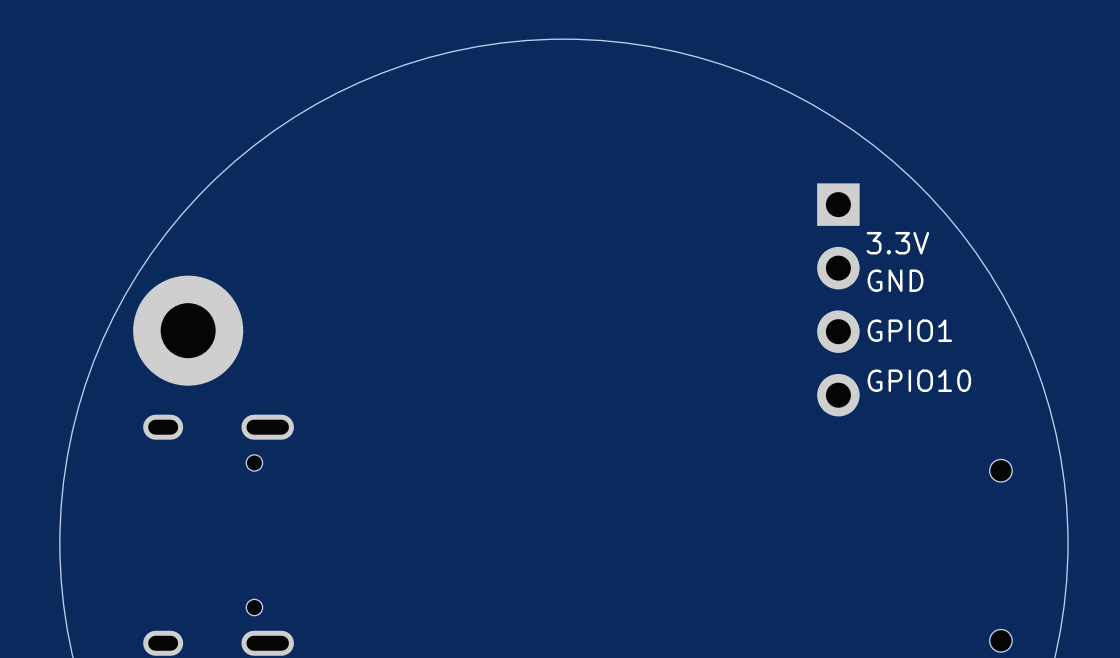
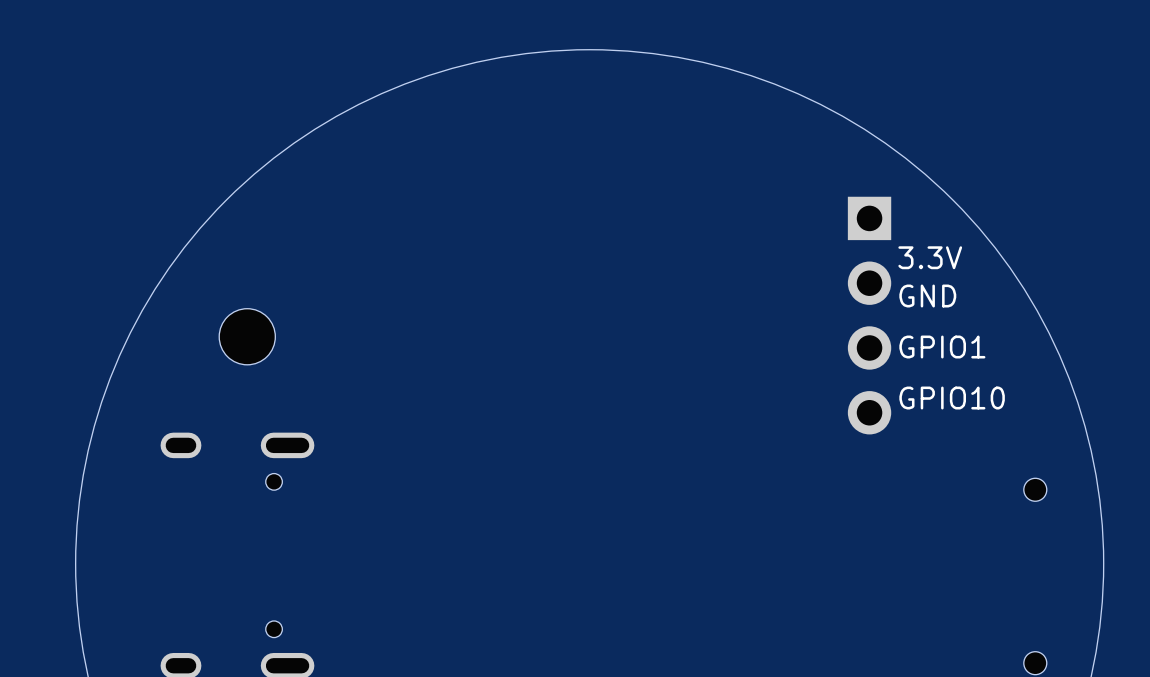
part: none -> (247, 336)
part: (188, 330) -> none

